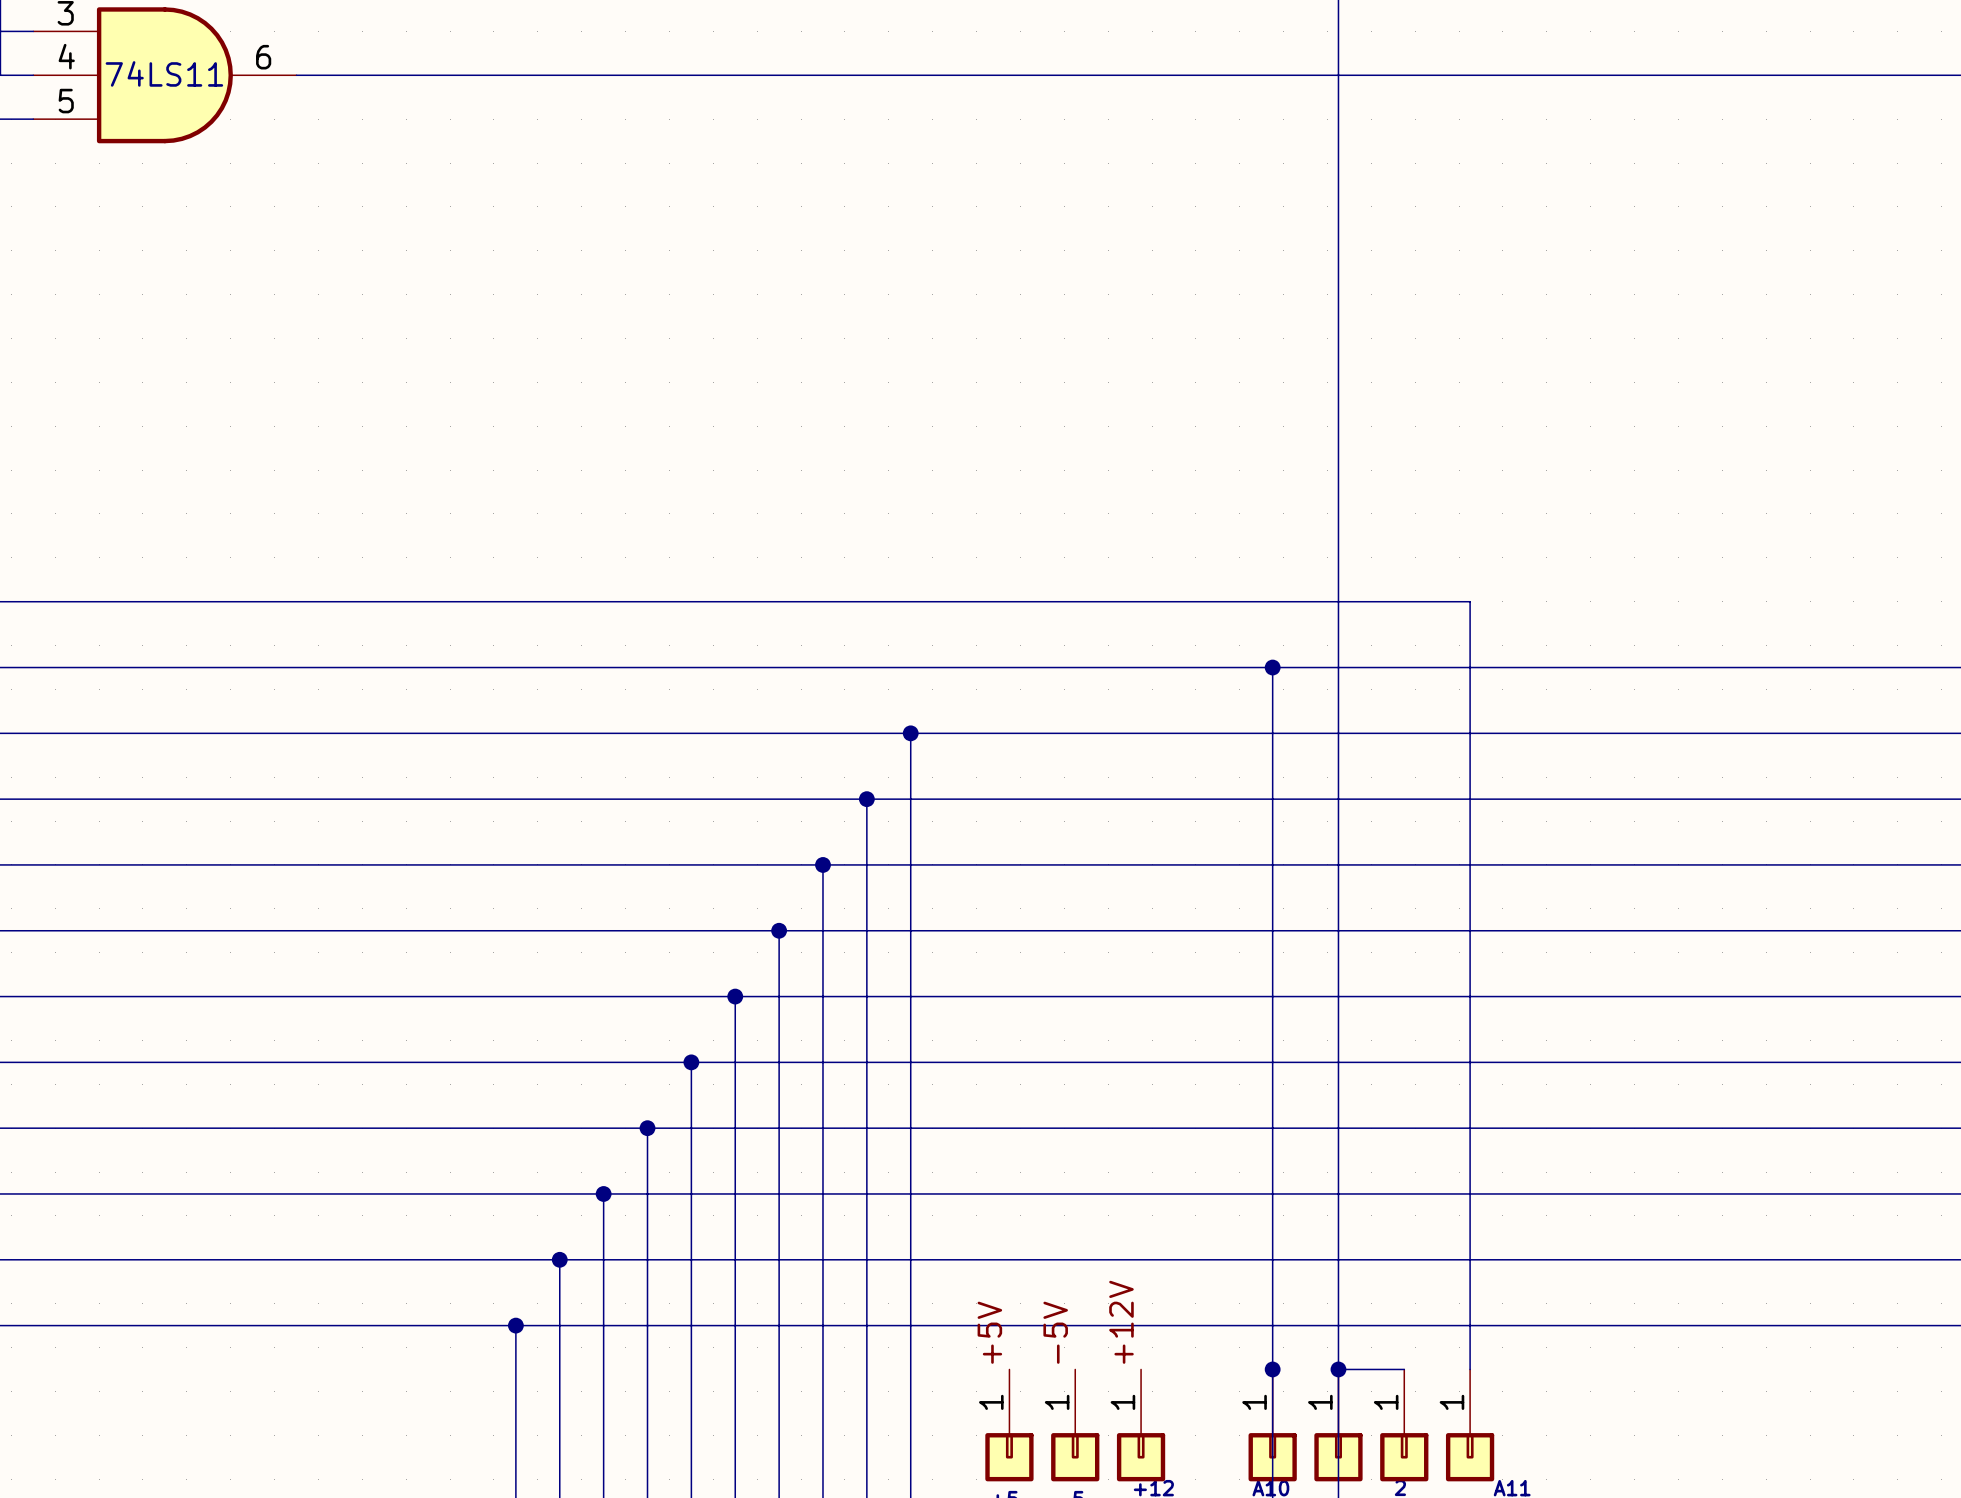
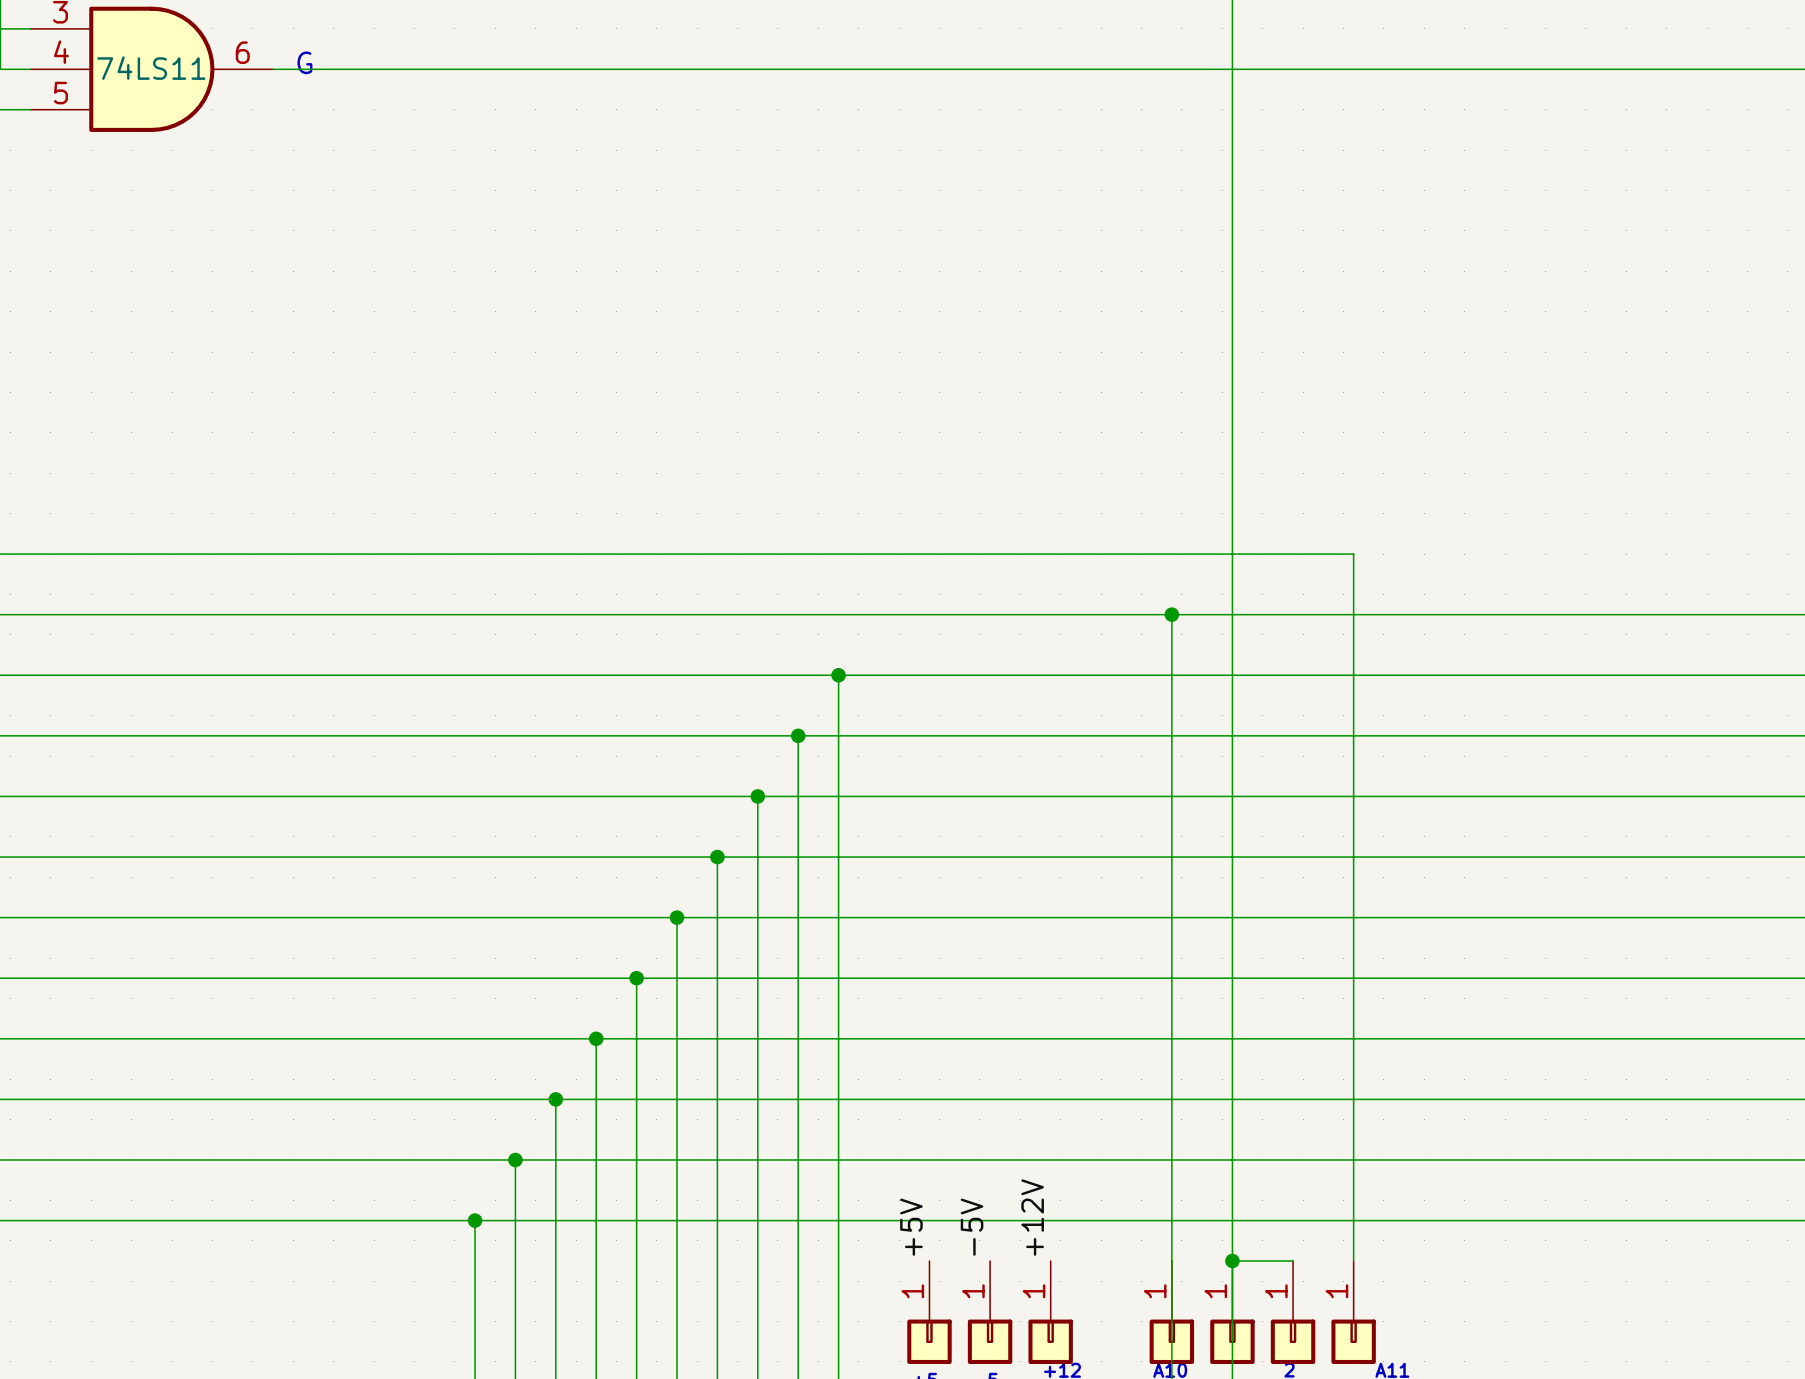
text: none -> G (304, 62)
junction: (1272, 1369) -> none

